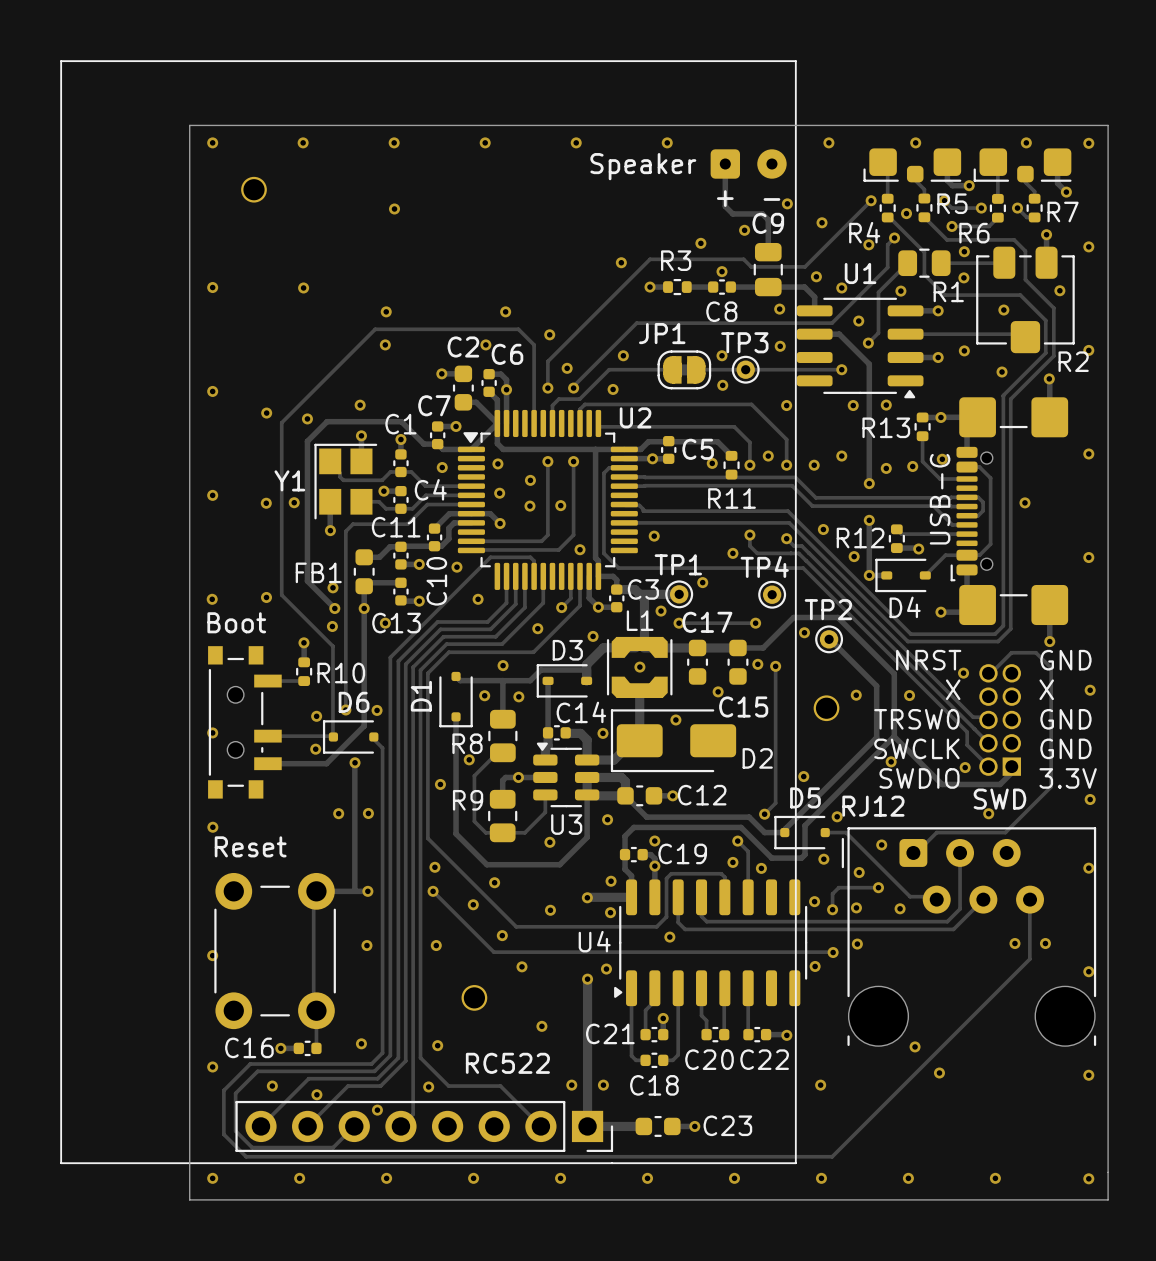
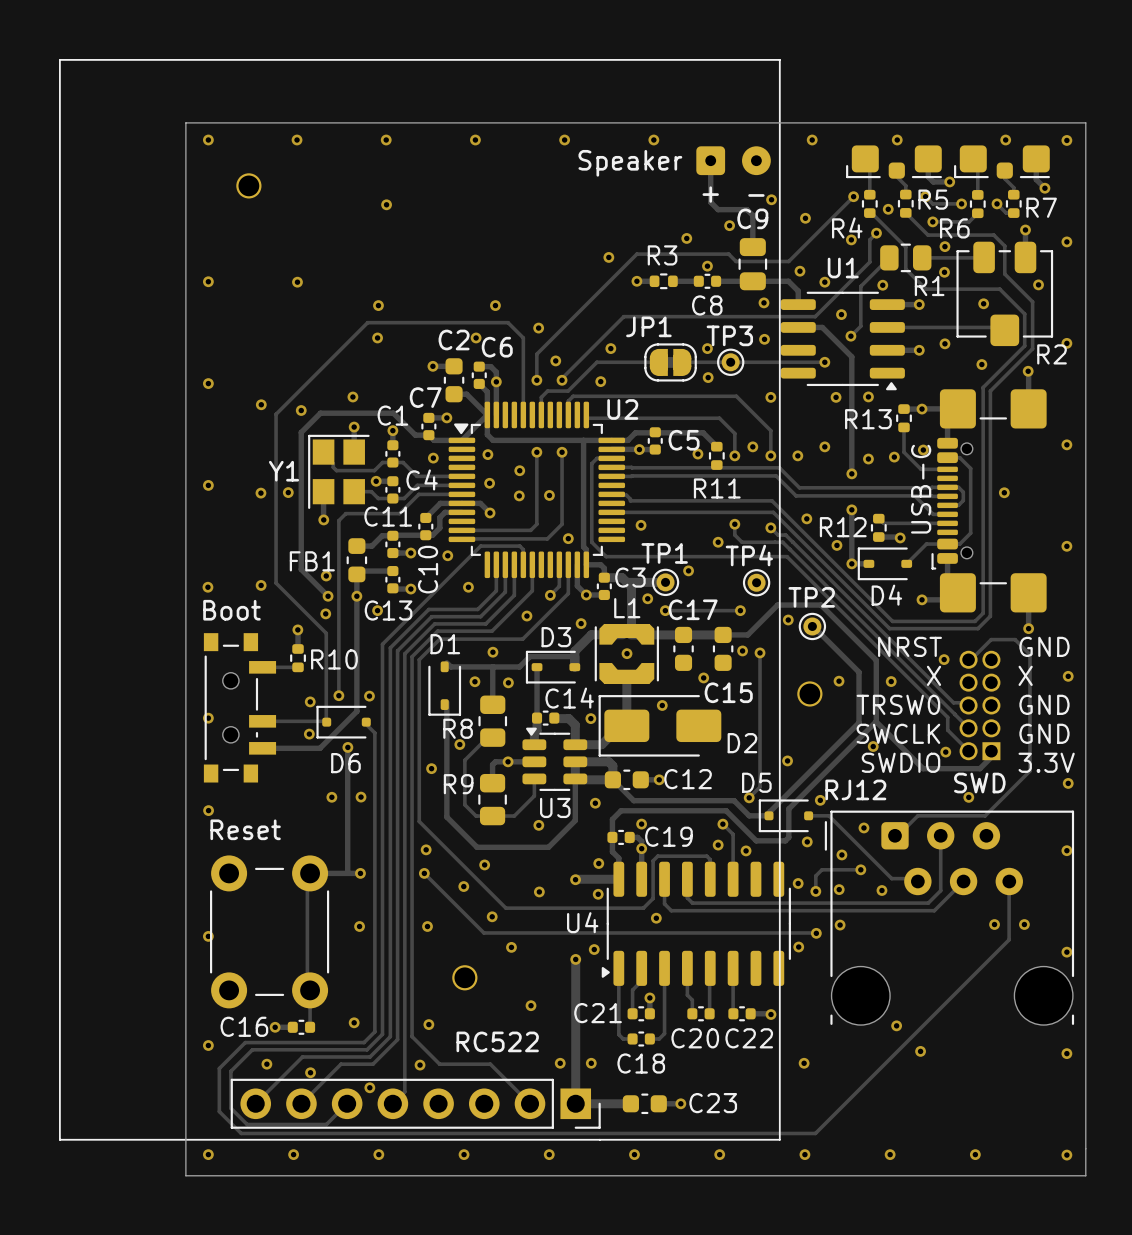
D1 footprint: [439, 671, 473, 728] -> [428, 661, 462, 716]
D1 name rotation: 0° (421, 696) -> 90° clockwise (445, 644)
D1 name position: D1 (421, 696) -> D1 (445, 644)
D6 name position: D6 (354, 702) -> D6 (345, 763)
D5 name position: D5 (805, 797) -> D5 (756, 782)

